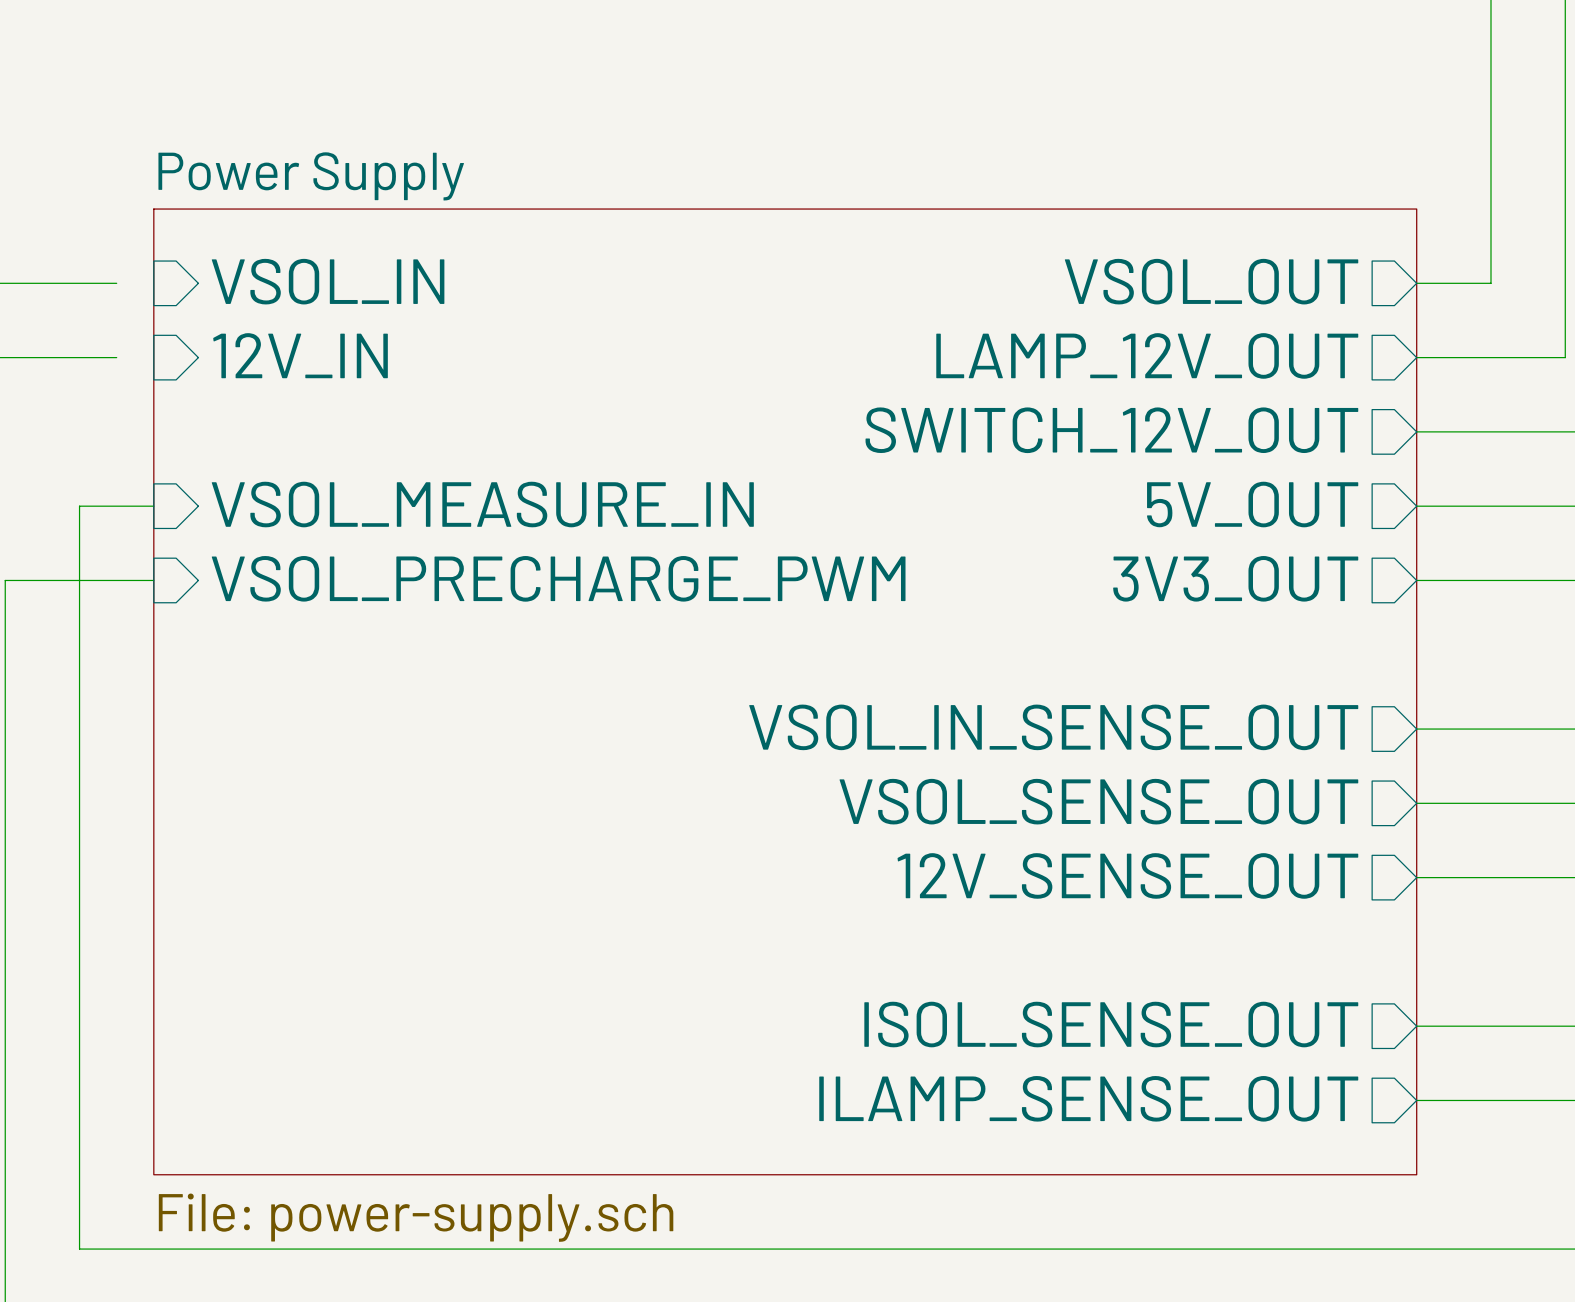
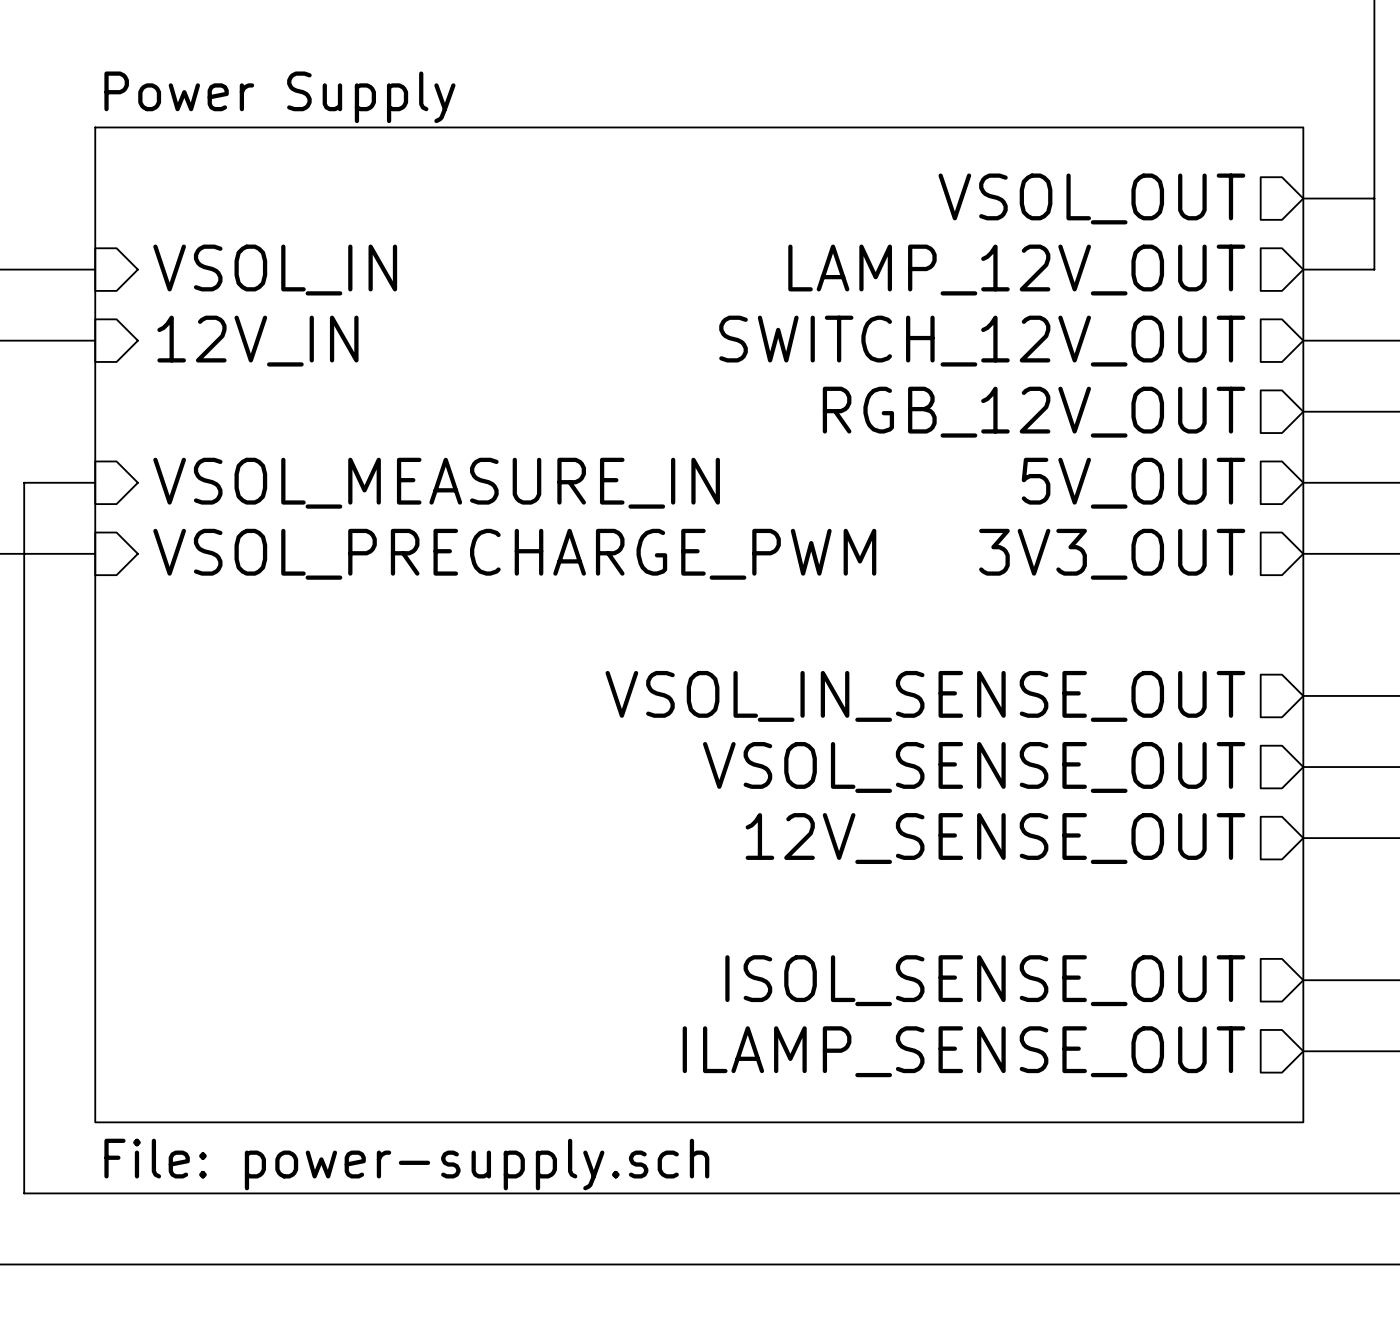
sheet pin: none -> VSOL_OUT (1091, 198)
wire: none -> (1303, 198) (1374, 198)
sheet pin: VSOL_OUT (1211, 281) -> LAMP_12V_OUT (1016, 270)
wire: none -> (59, 269) (95, 269)
sheet pin: LAMP_12V_OUT (1147, 355) -> SWITCH_12V_OUT (982, 341)
wire: none -> (59, 340) (95, 340)
sheet pin: SWITCH_12V_OUT (1111, 430) -> RGB_12V_OUT (1034, 412)
sheet Power Supply: none -> File: power-supply.sch (699, 624)
sheet Power Supply: File: power-supply.sch (785, 691) -> none

